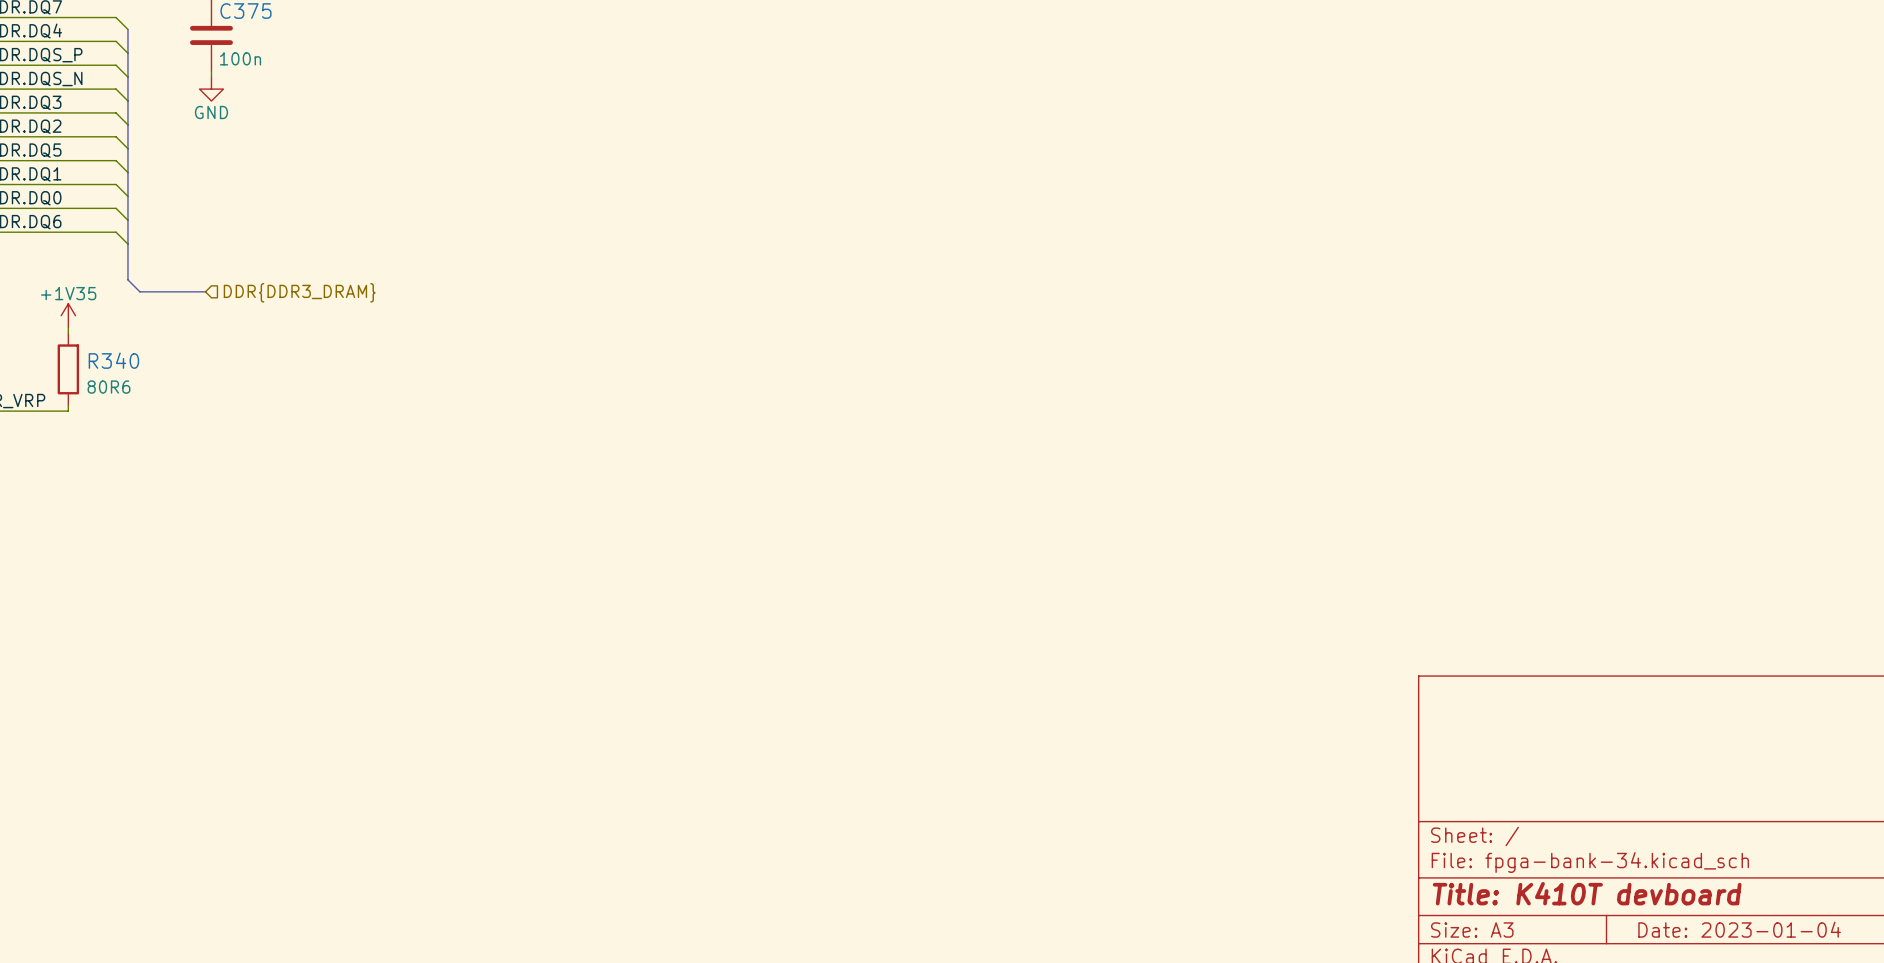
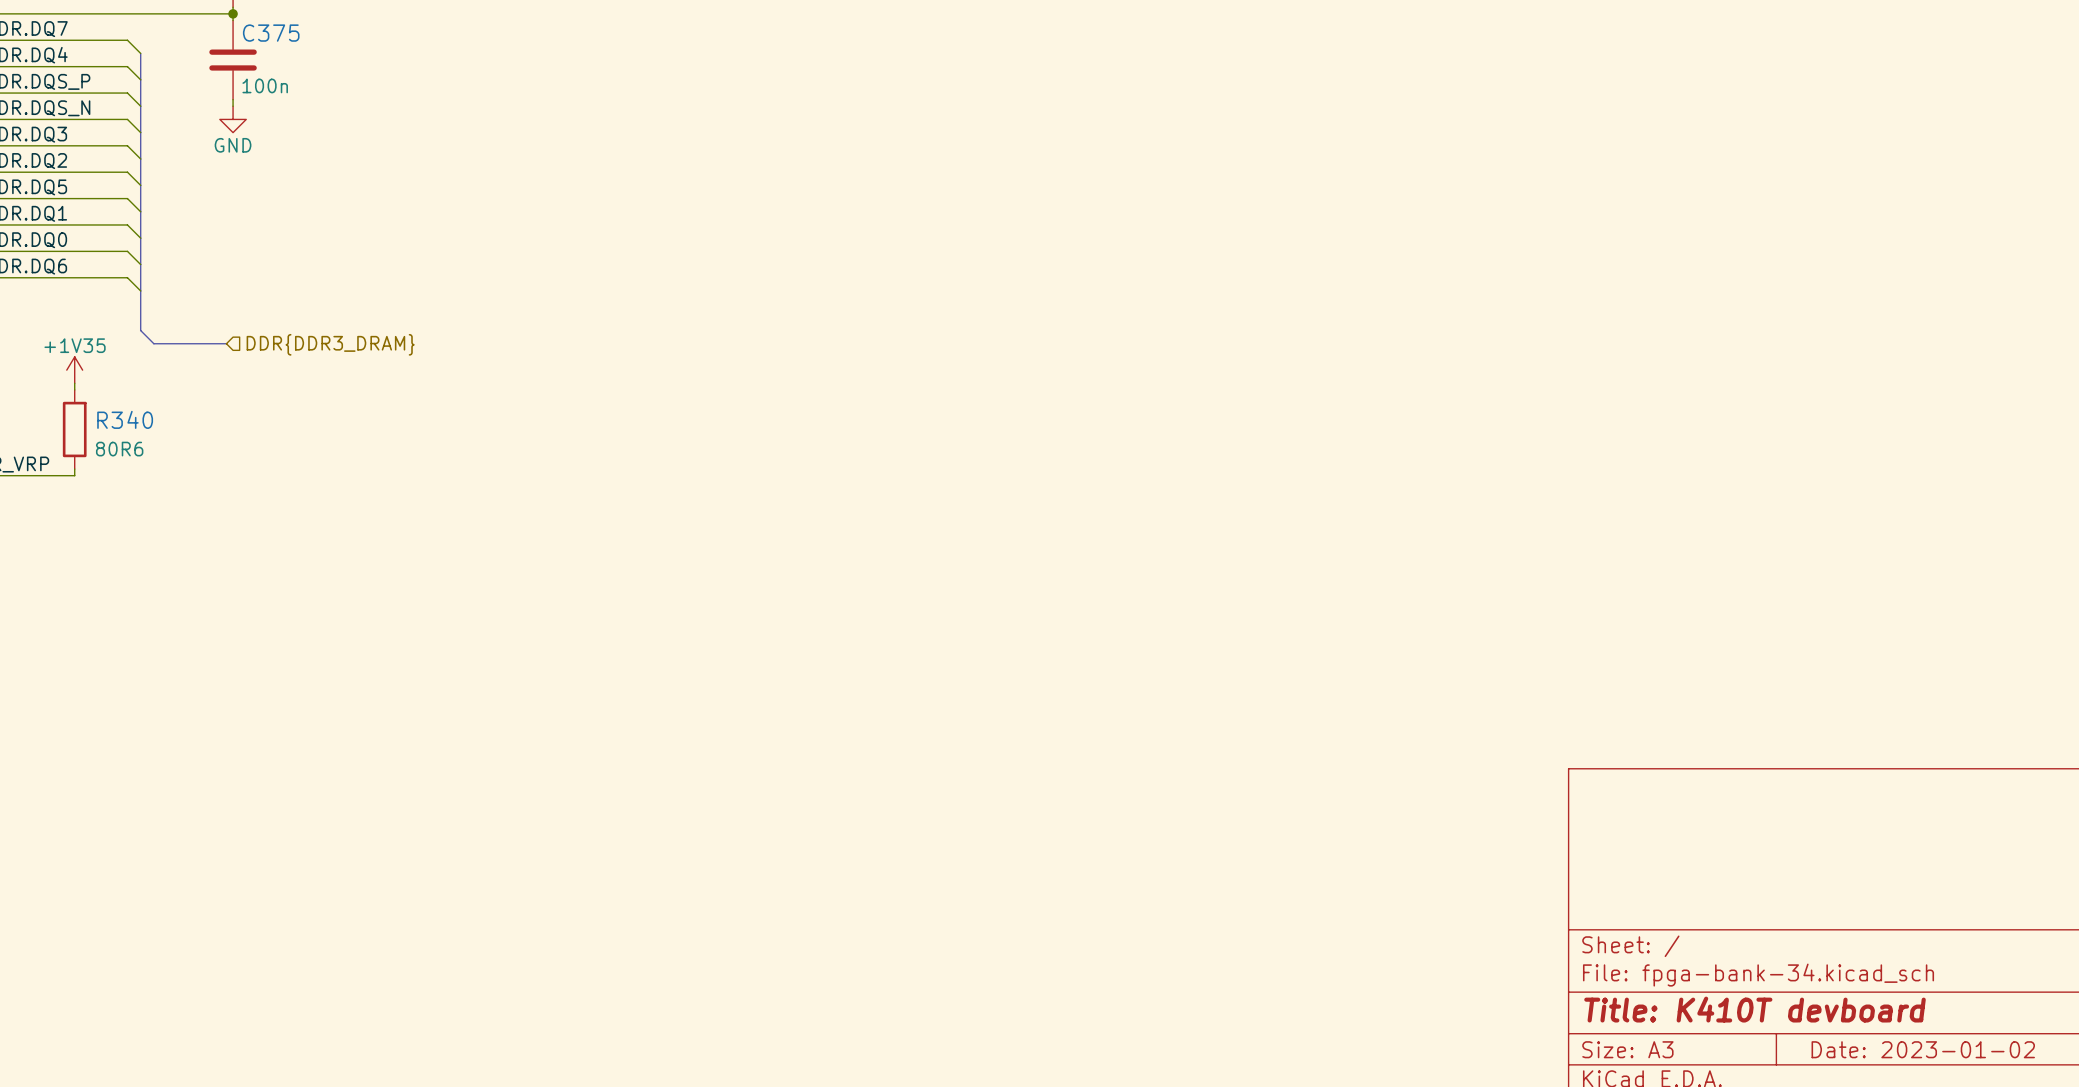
title block: Date: 2023-01-04 (1739, 929) -> Date: 2023-01-02 (1923, 1049)

